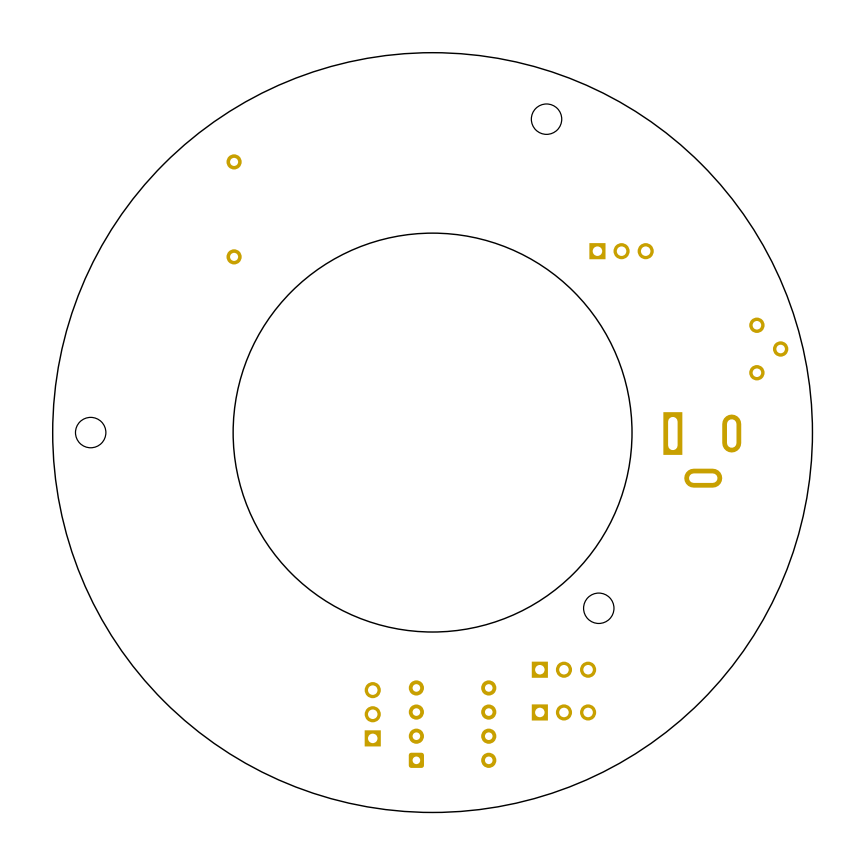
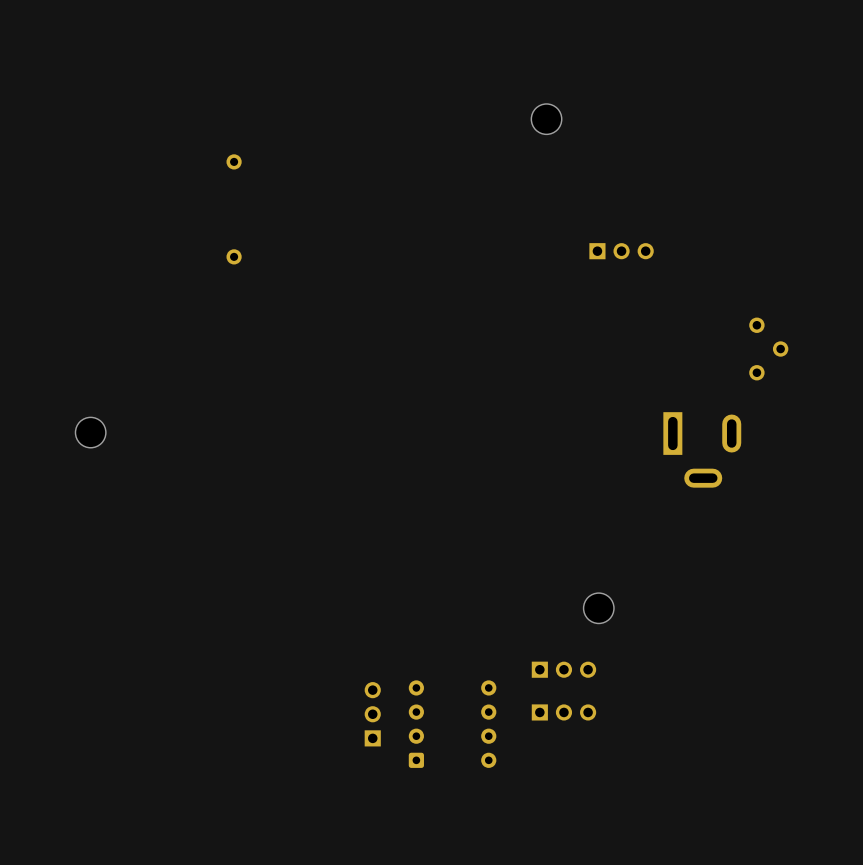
round board edge: [51, 51, 814, 814] -> none
round board edge: [232, 232, 633, 633] -> none

